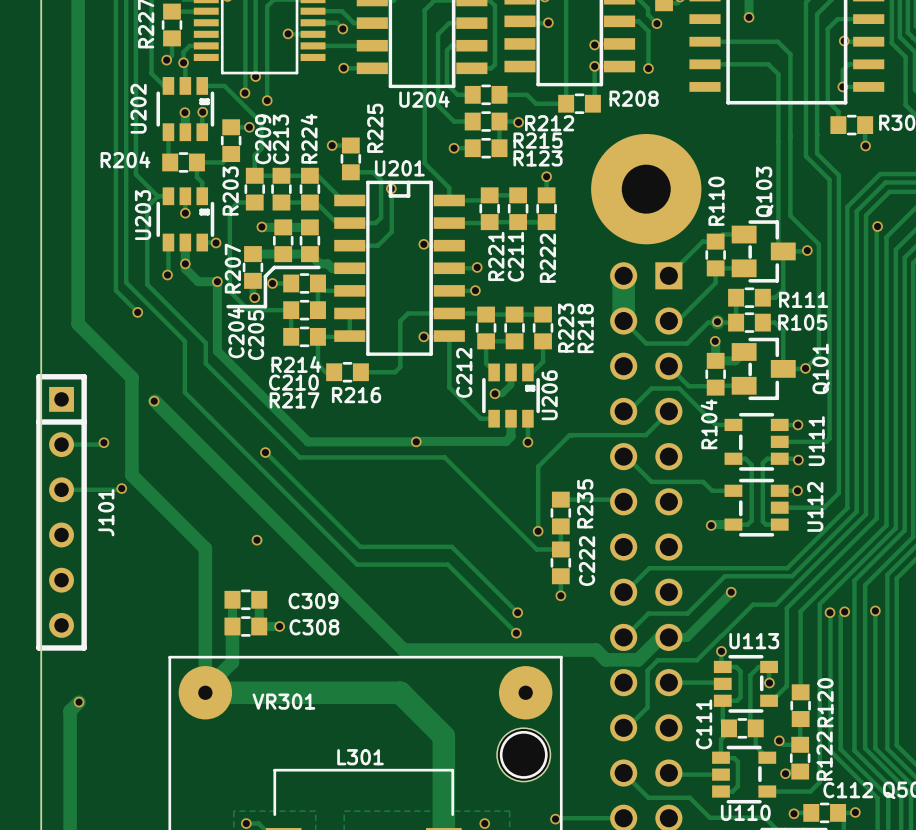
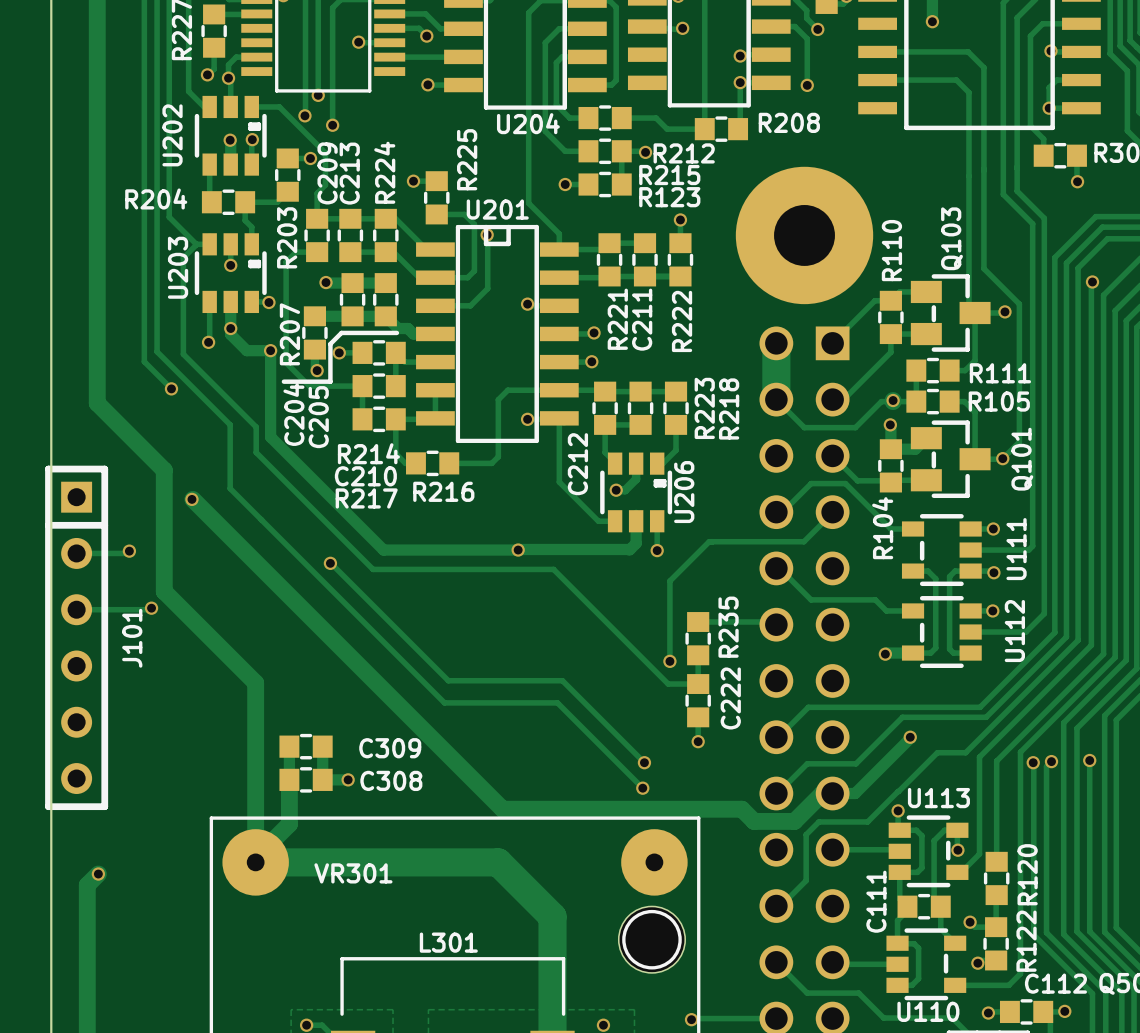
via: (256, 540) -> none

